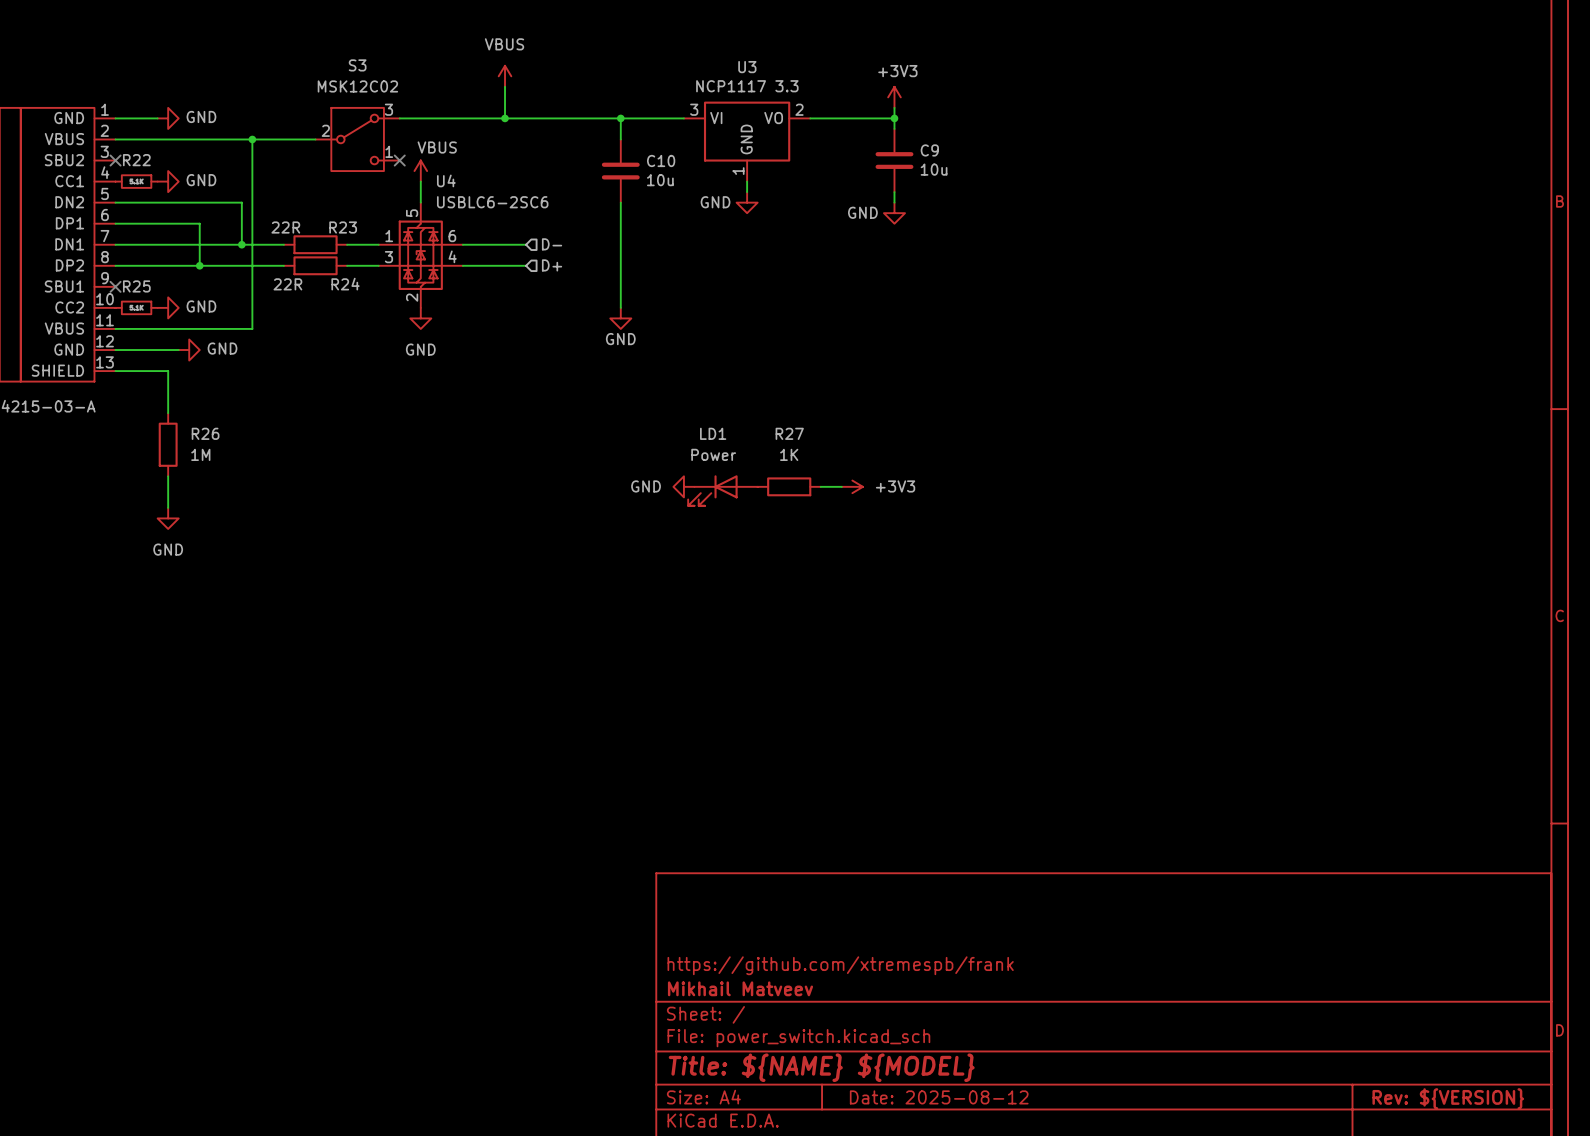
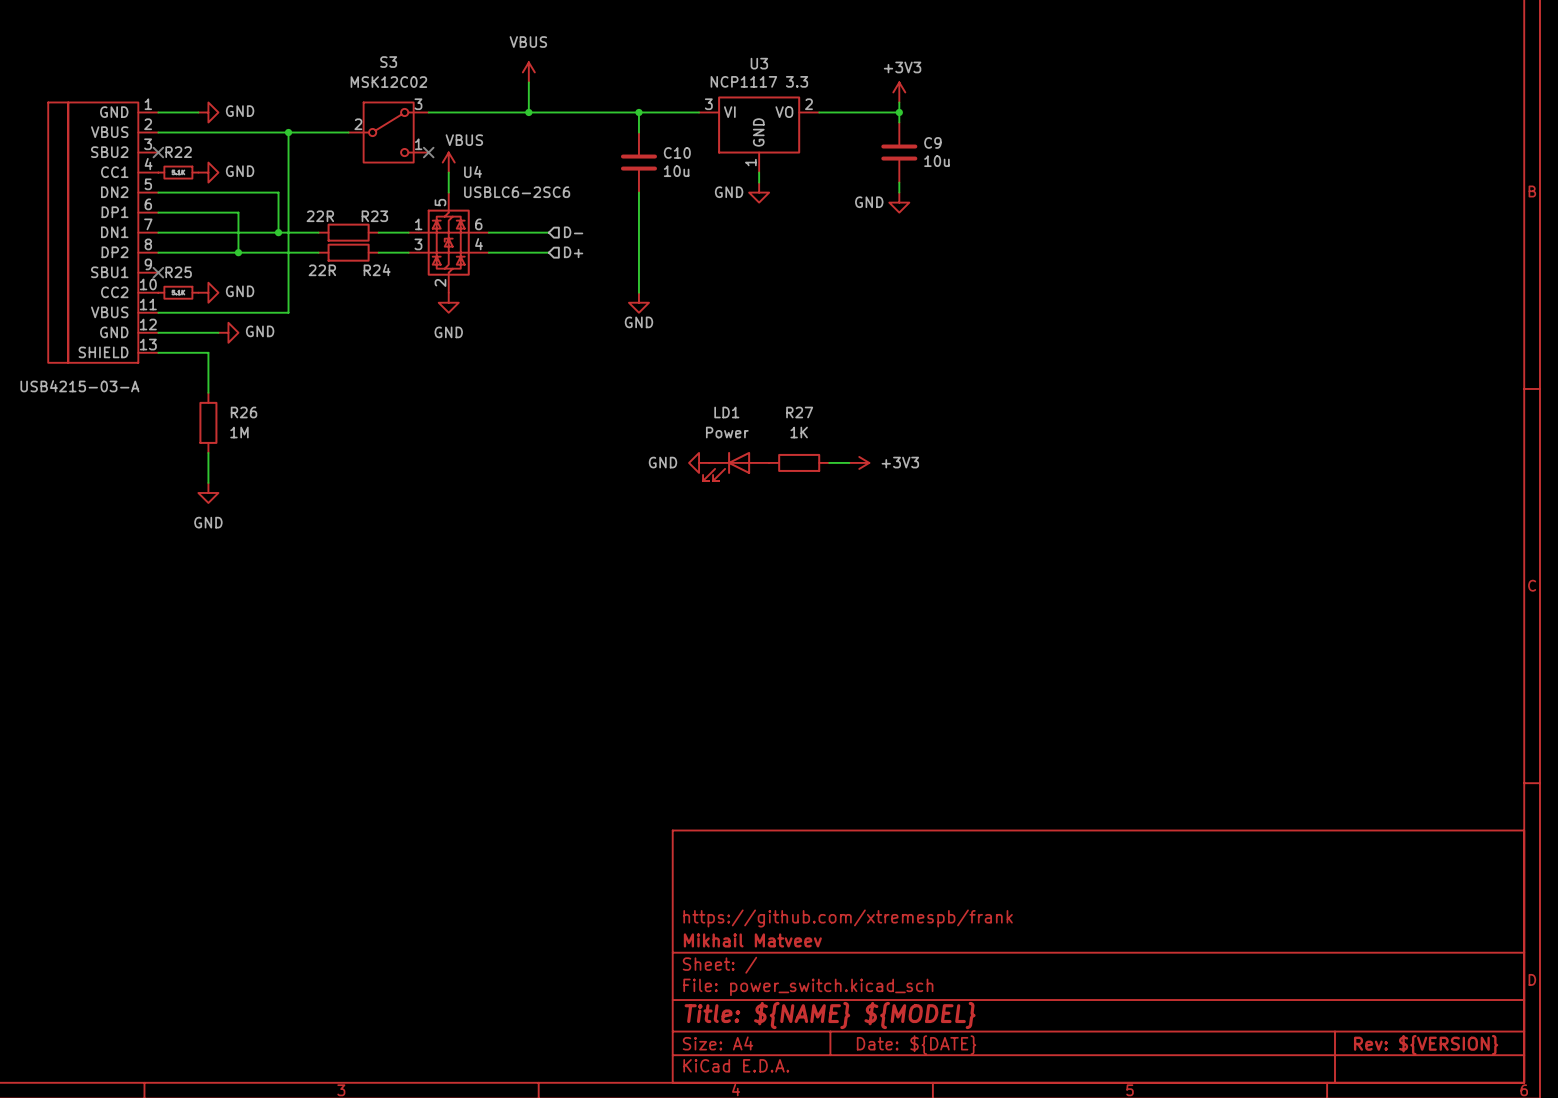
title block: Date: 2025-08-12 (939, 1097) -> Date: ${DATE} (916, 1045)

